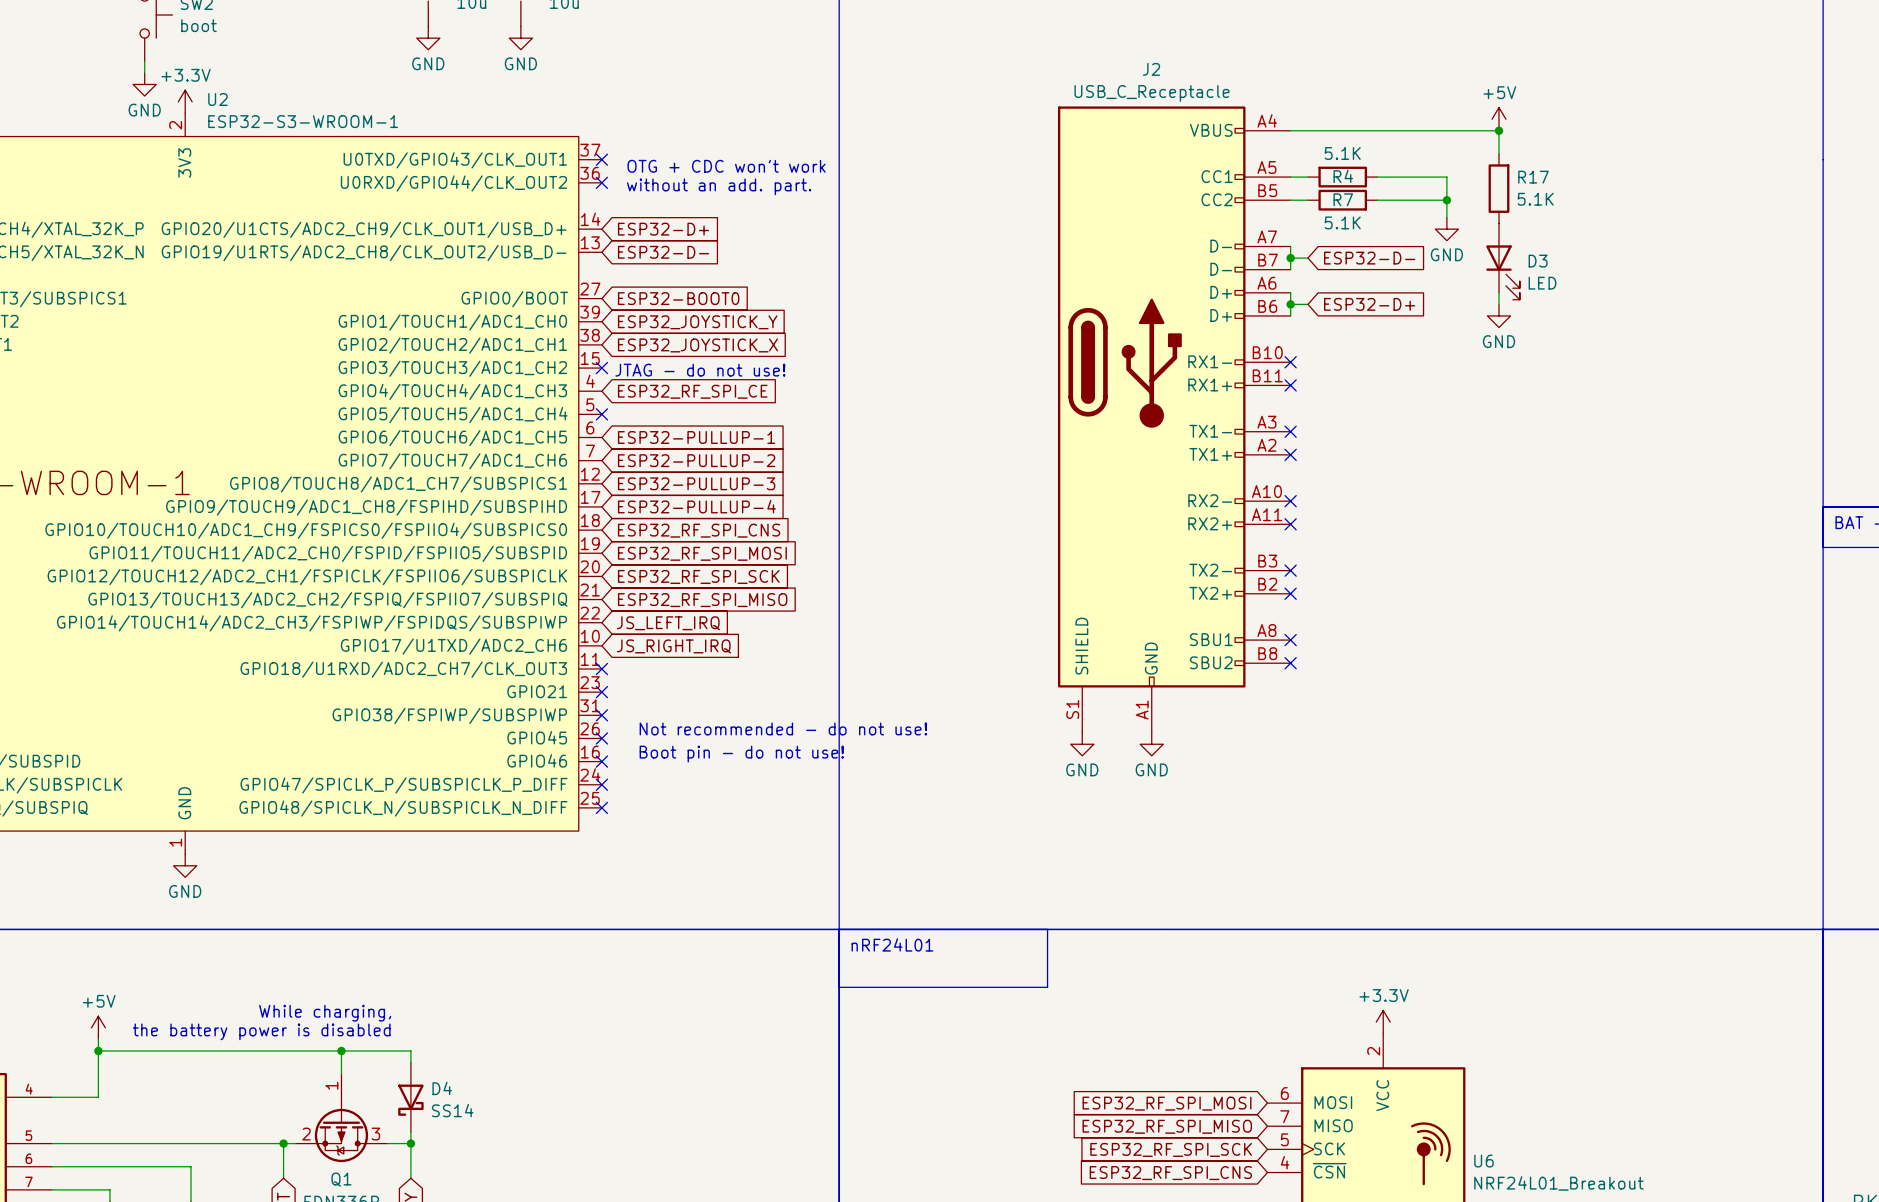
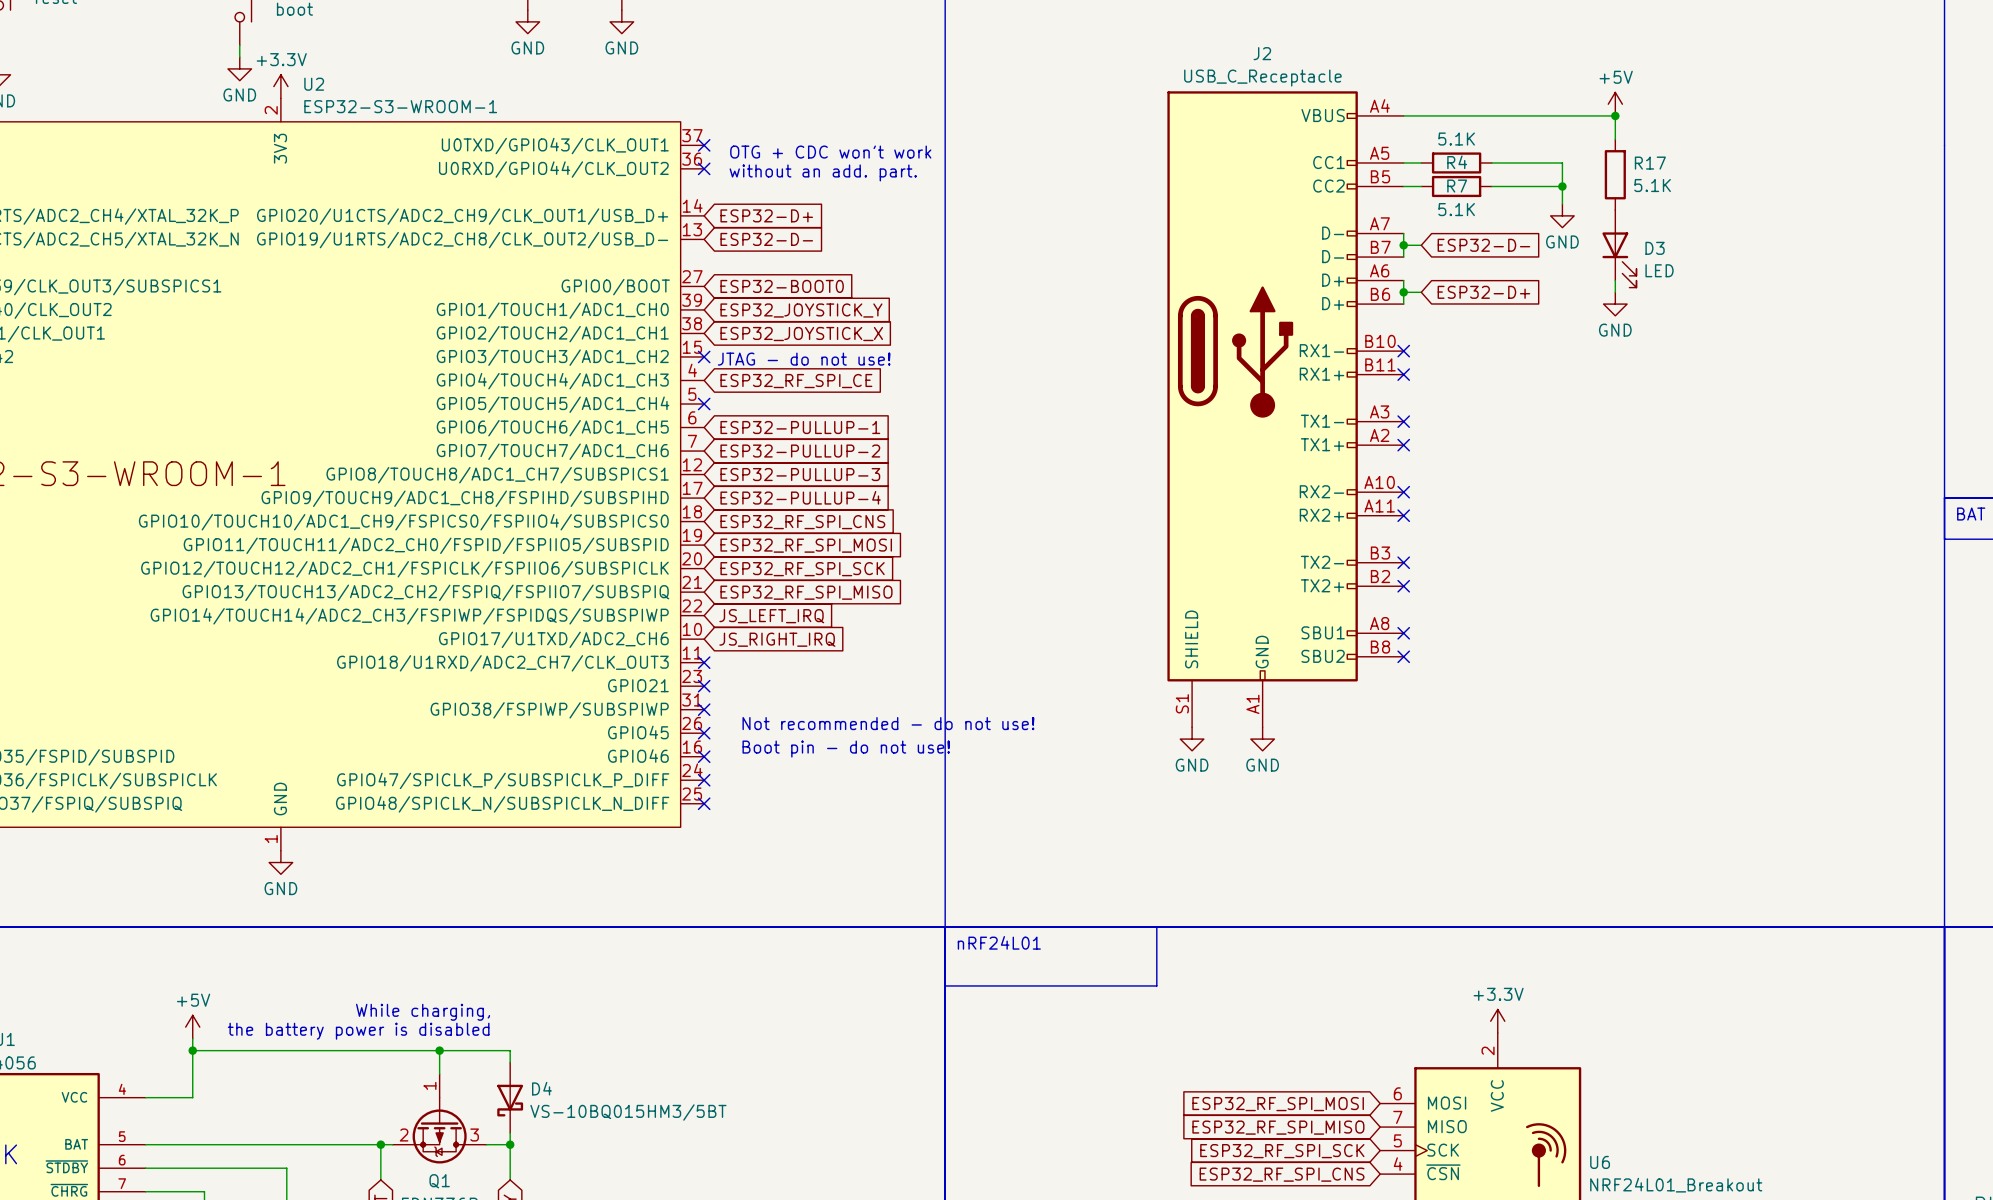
D4 value: SS14 (452, 1110) -> VS-10BQ015HM3/5BT (628, 1112)

